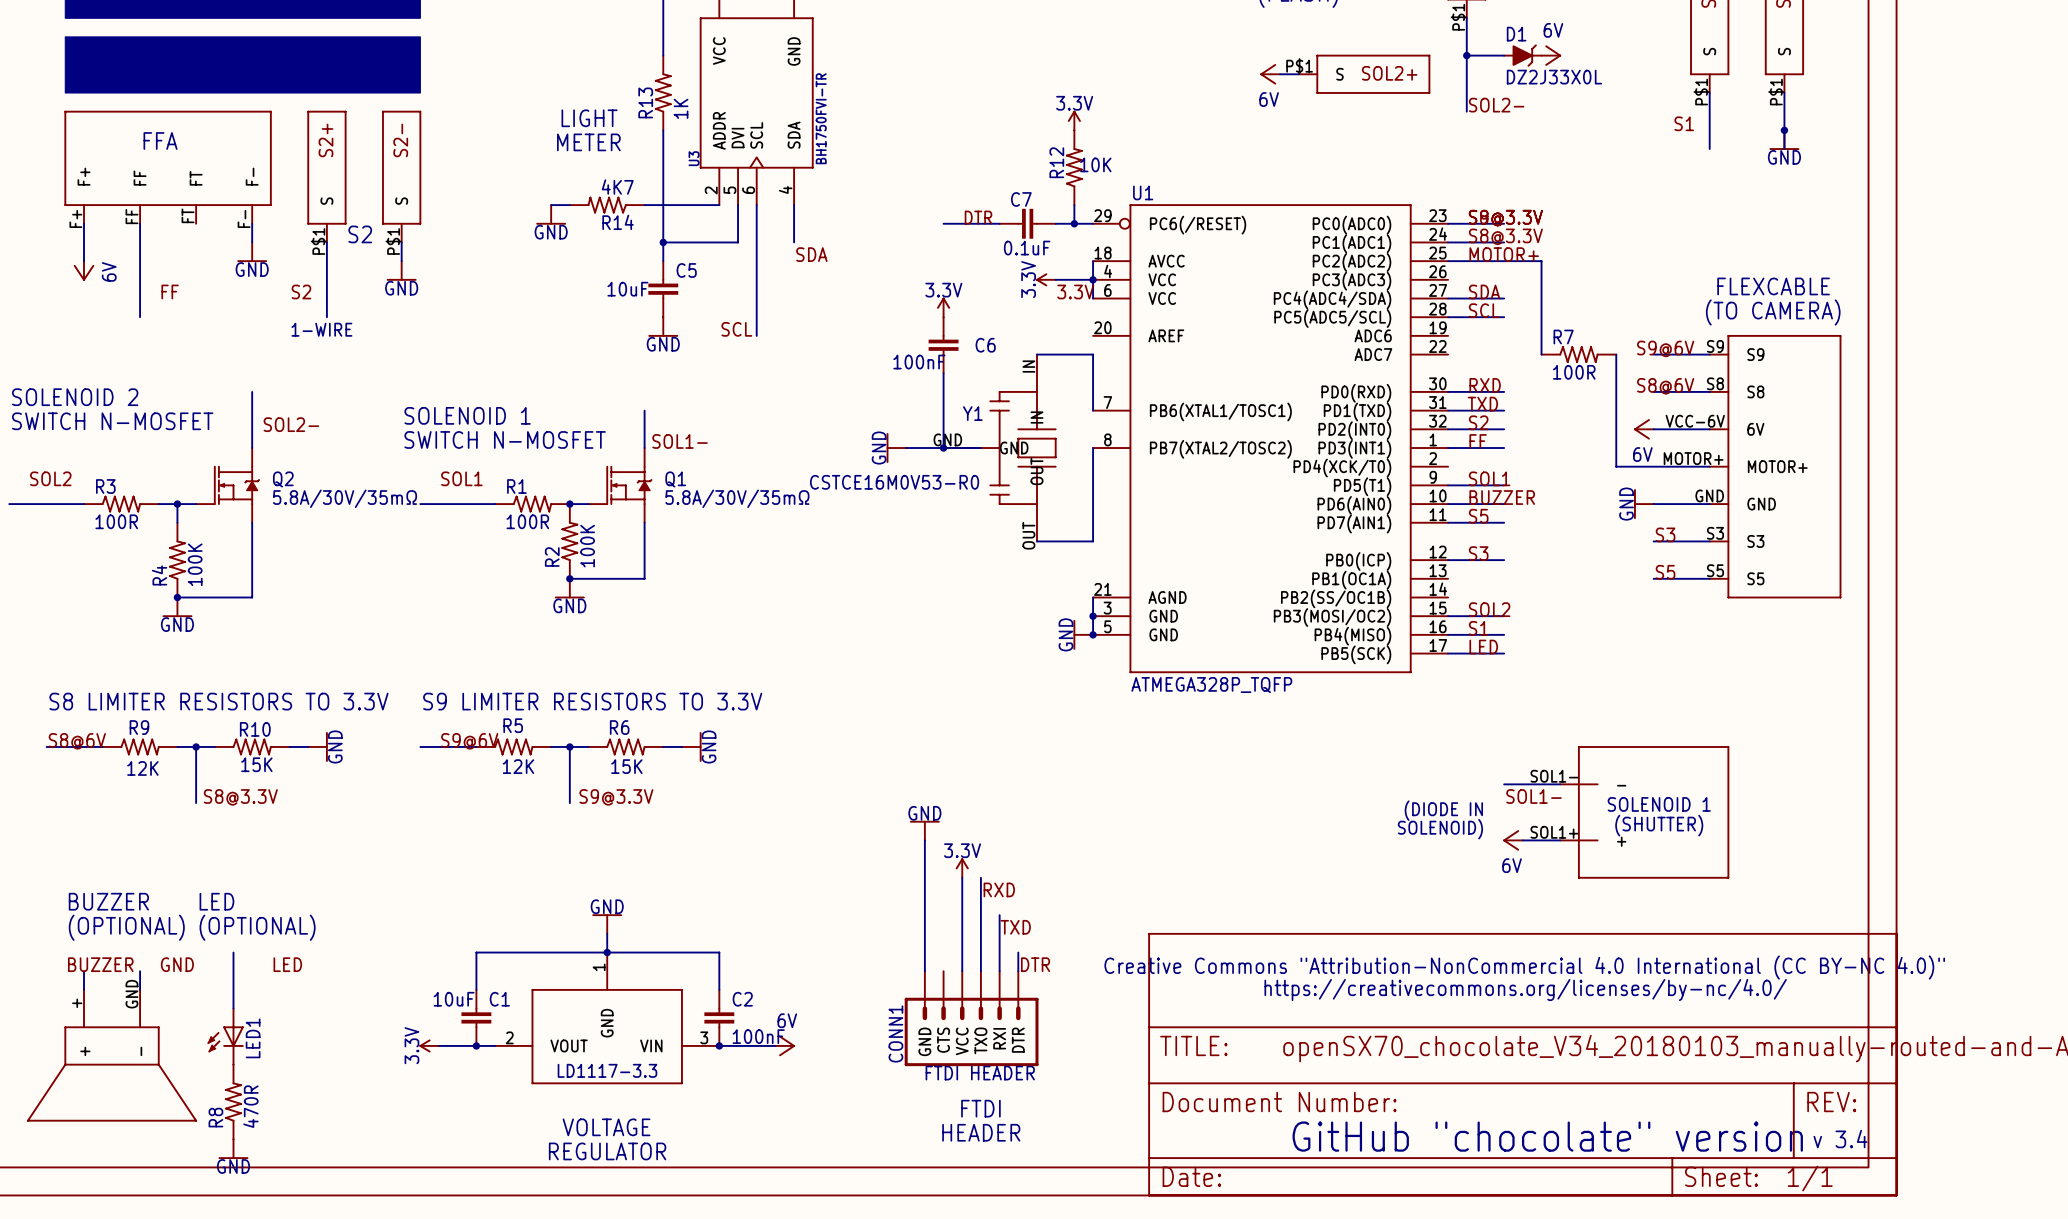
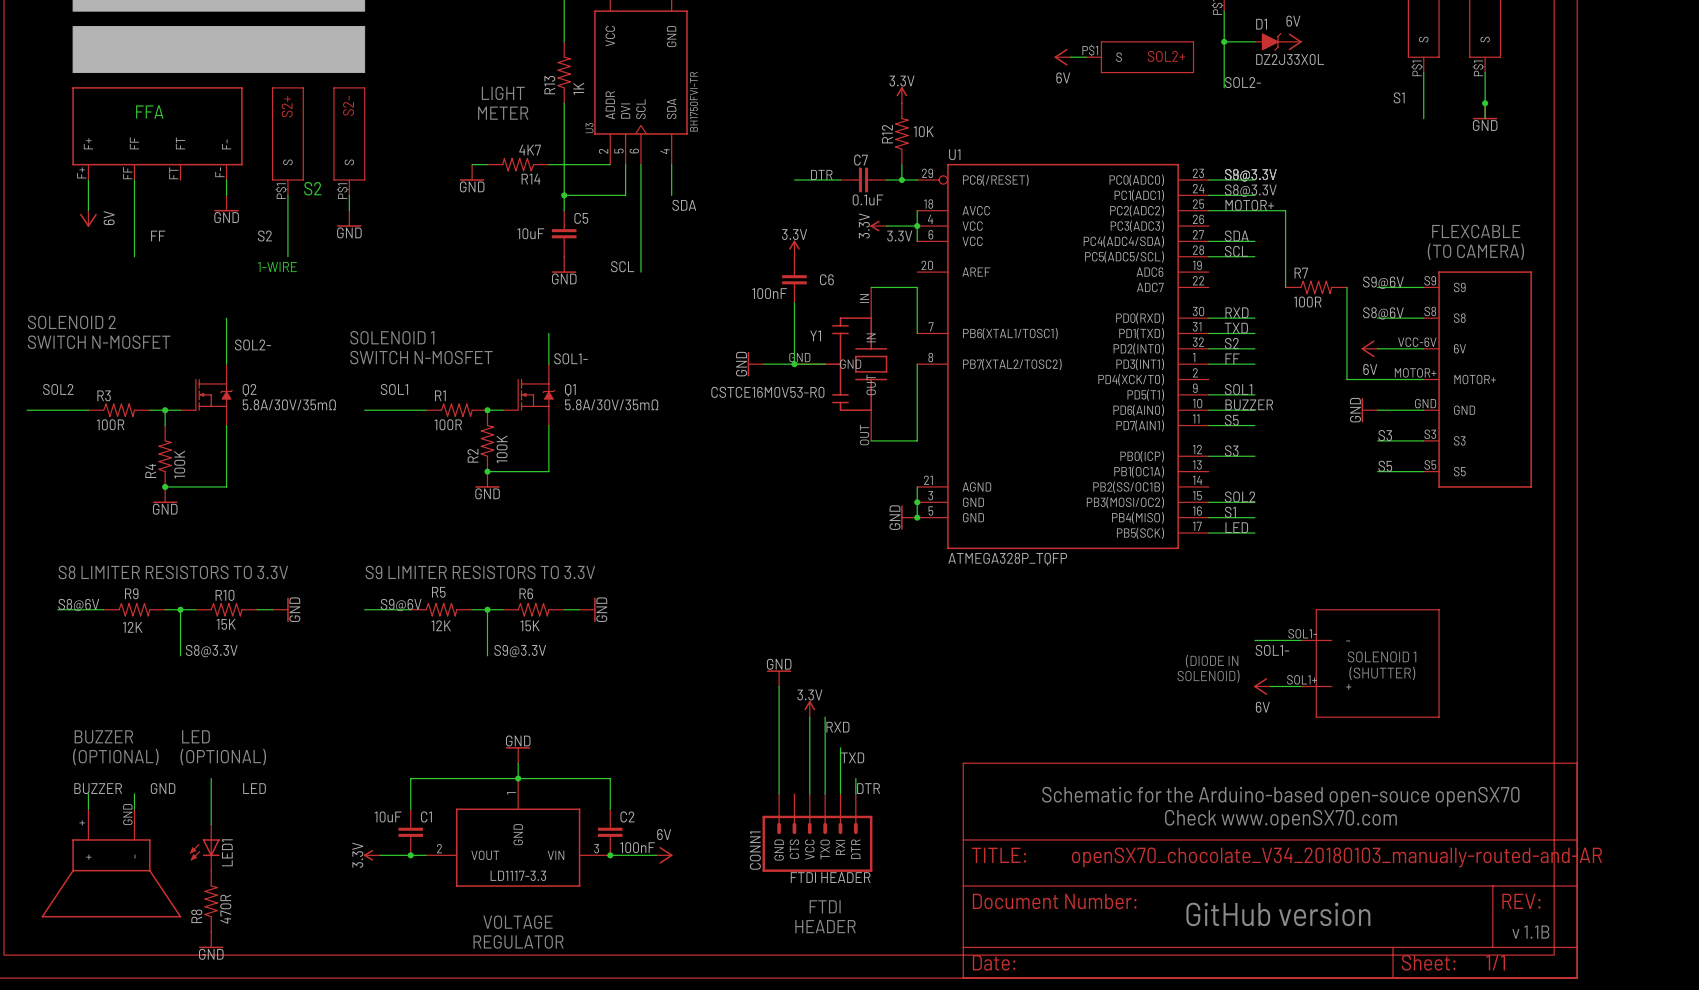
text: Creative Commons "Attribution-NonCommercial 4.0 International (CC BY-NC 4.0)" (1524, 967) -> none
text: none -> Schematic for the Arduino-based open-souce openSX70 (1280, 796)
text: https://creativecommons.org/licenses/by-nc/4.0/ (1525, 990) -> none
text: none -> Check www.openSX70.com (1280, 819)
text: GitHub "chocolate" version (1547, 1136) -> GitHub version (1278, 914)
text: v 3.4 (1840, 1139) -> v 1.1B (1530, 932)

